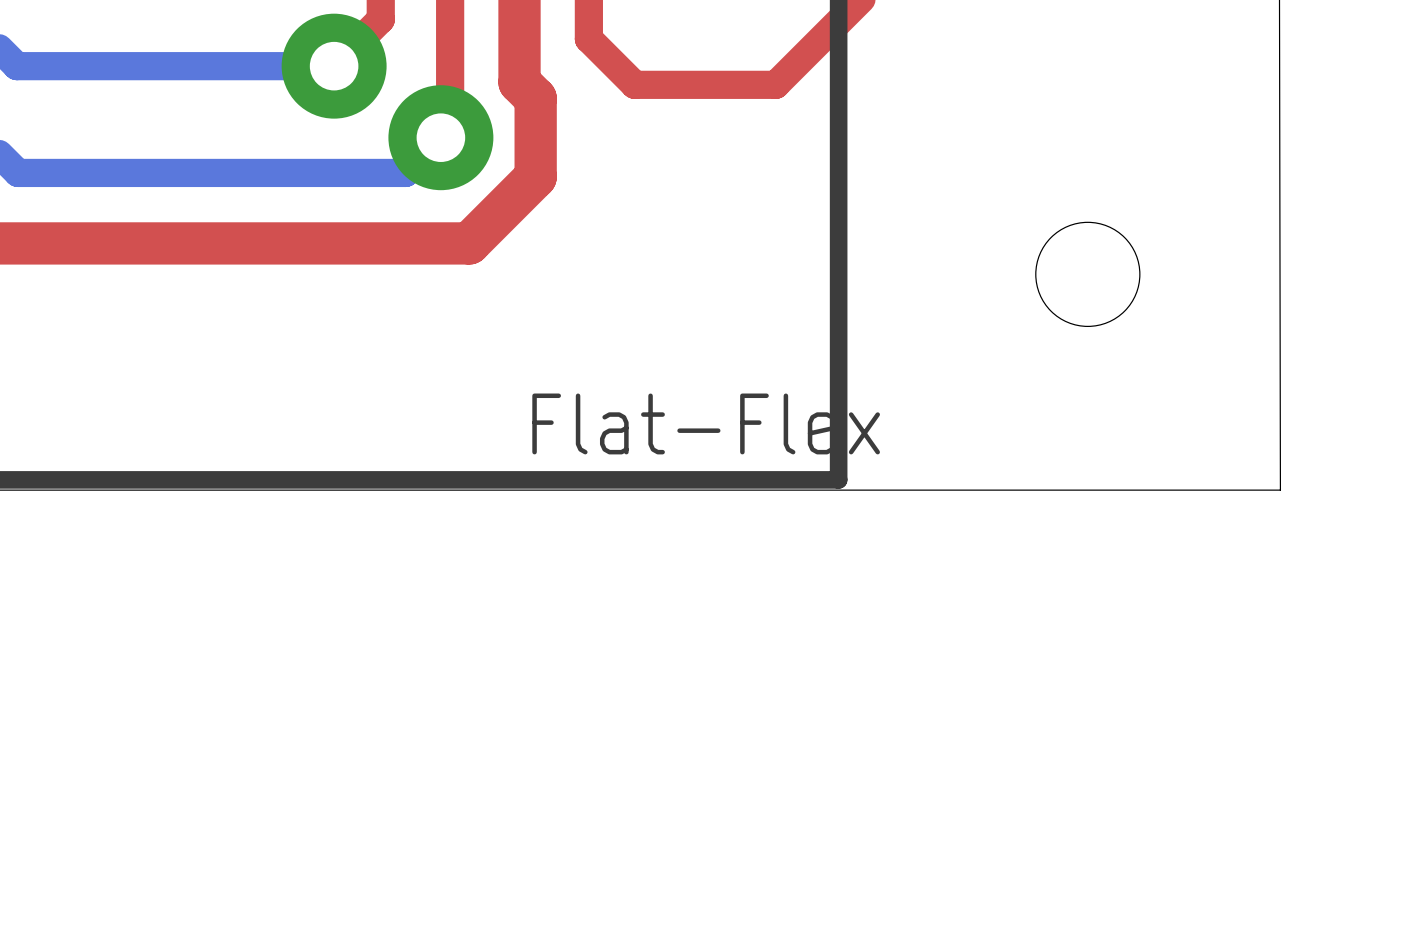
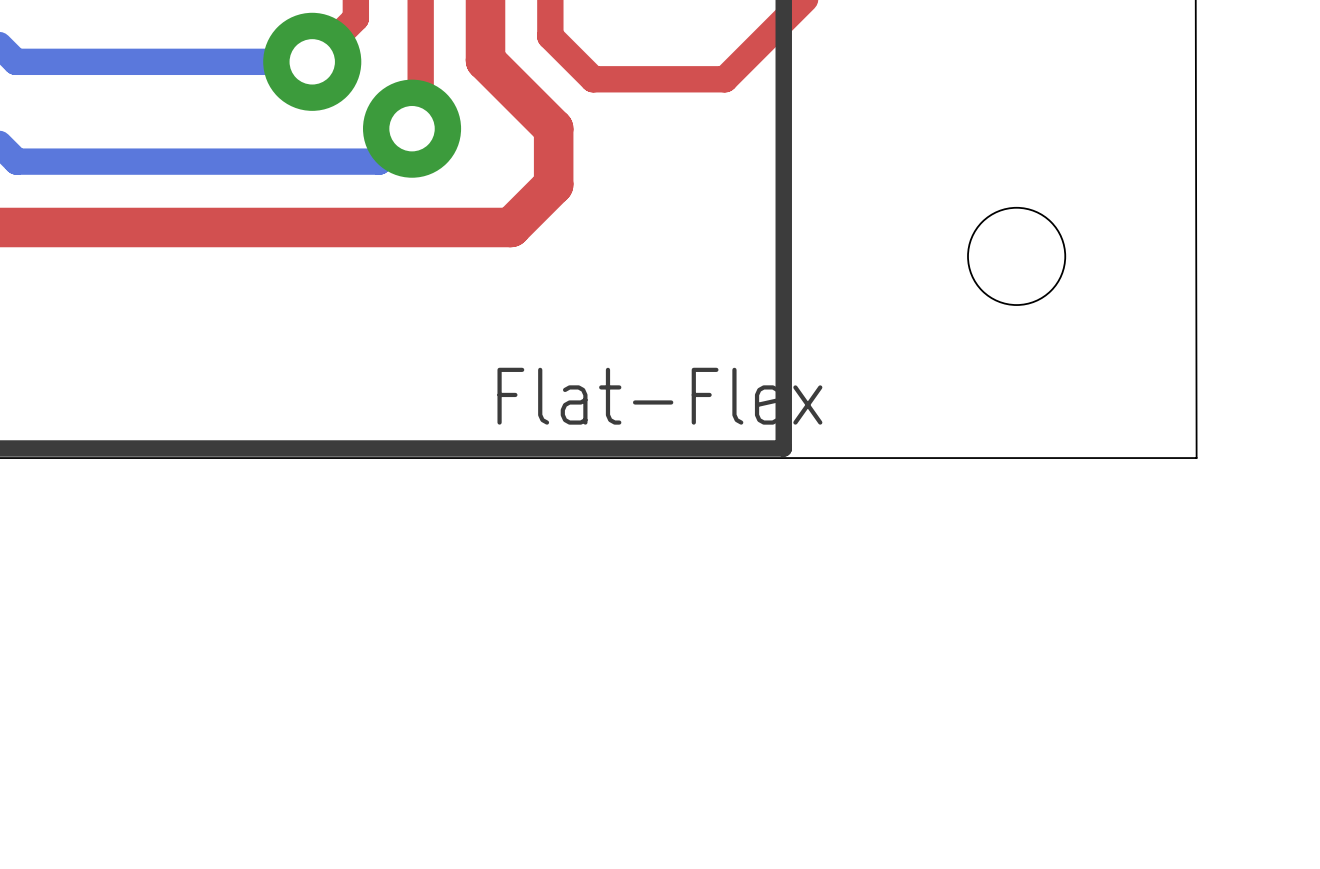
top track: (519, 64) (519, 82) (535, 98) (535, 176) (469, 243) -> (485, 60) (553, 128) (553, 184) (510, 227) (438, 227)

